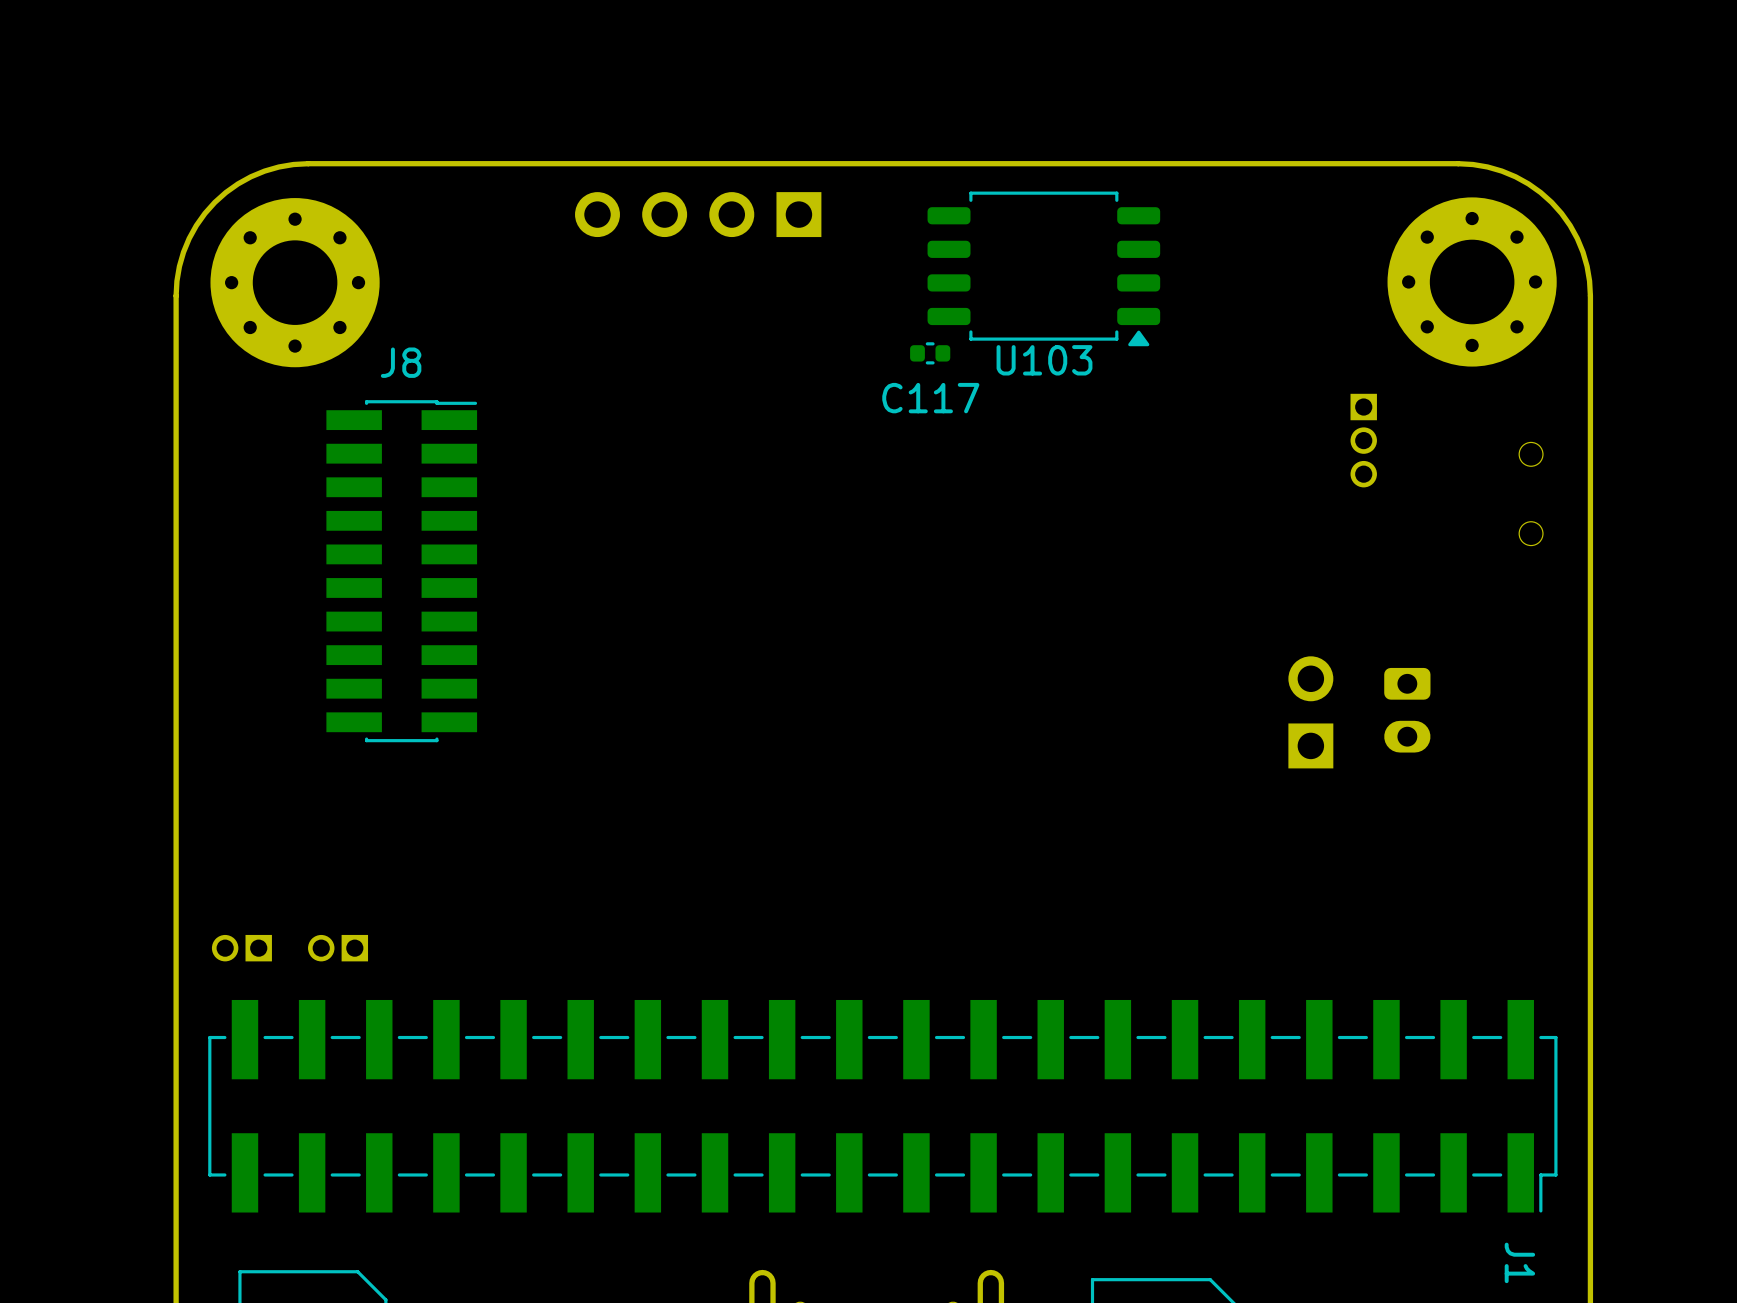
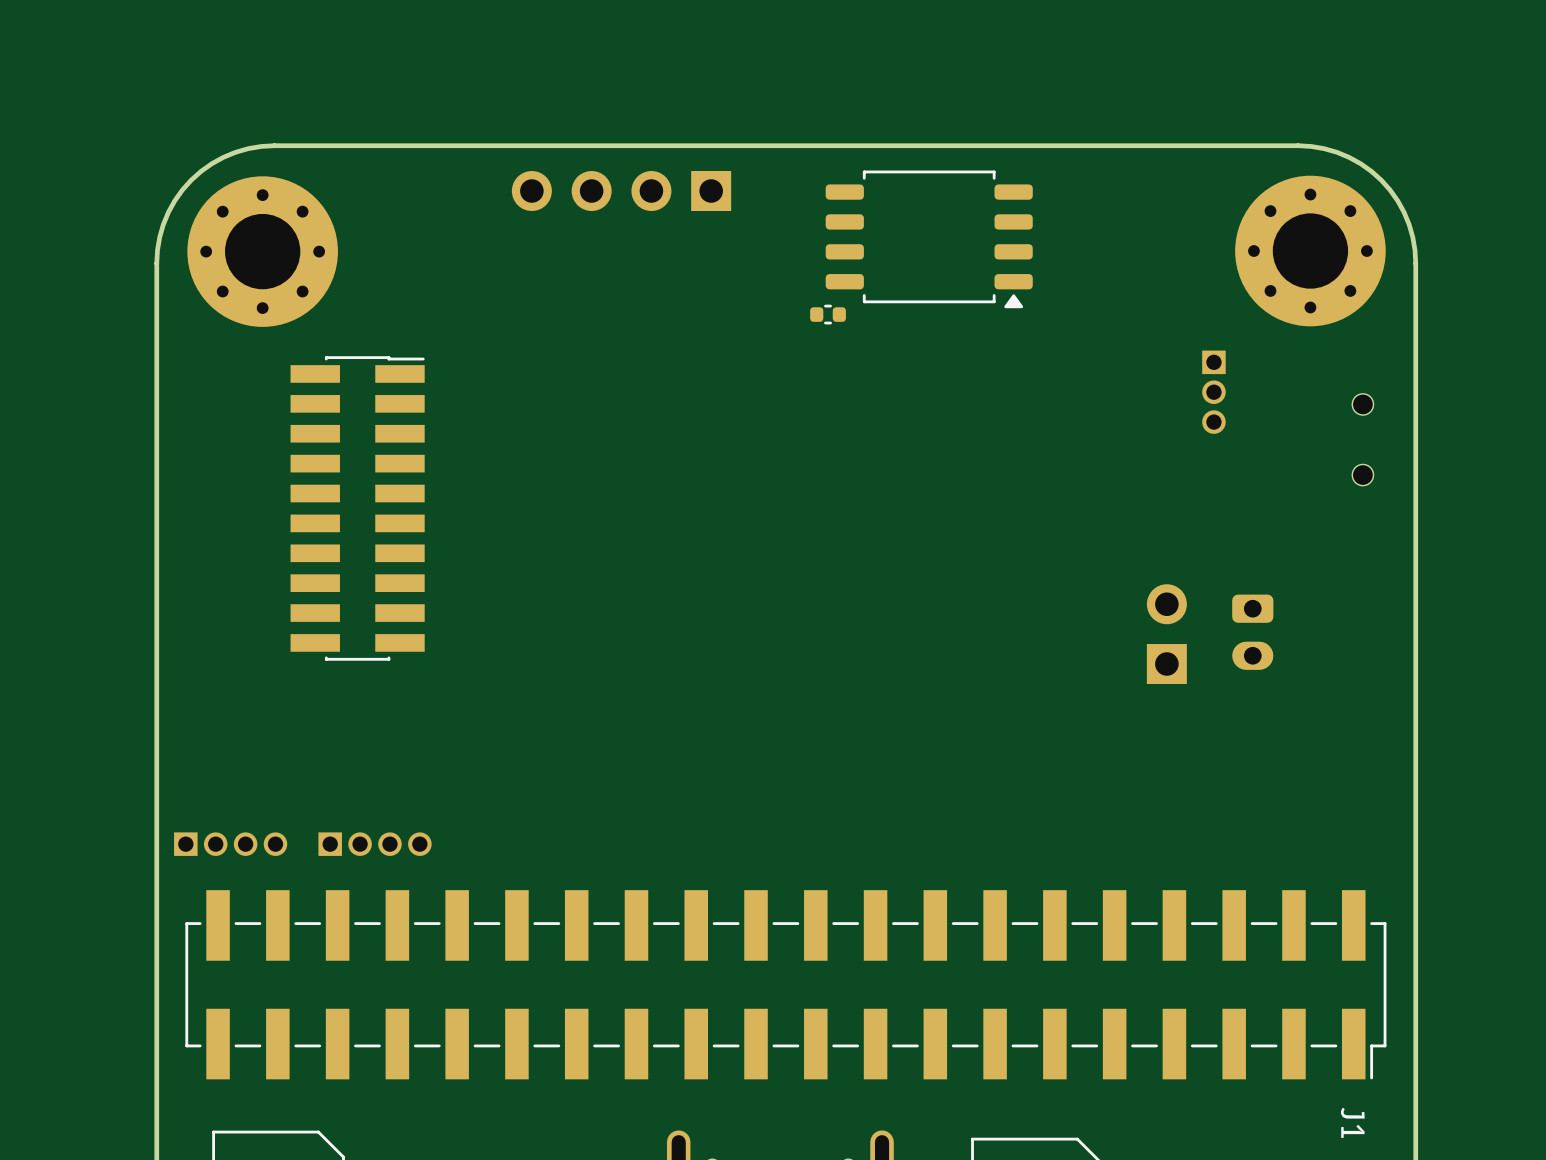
U103 name: U103 (1044, 360) -> none
J8 name: J8 (401, 362) -> none
C117 name: C117 (930, 398) -> none
part footprint: [211, 934, 272, 962] -> [174, 832, 288, 856]
part: (338, 948) -> none
part: none -> (375, 844)

